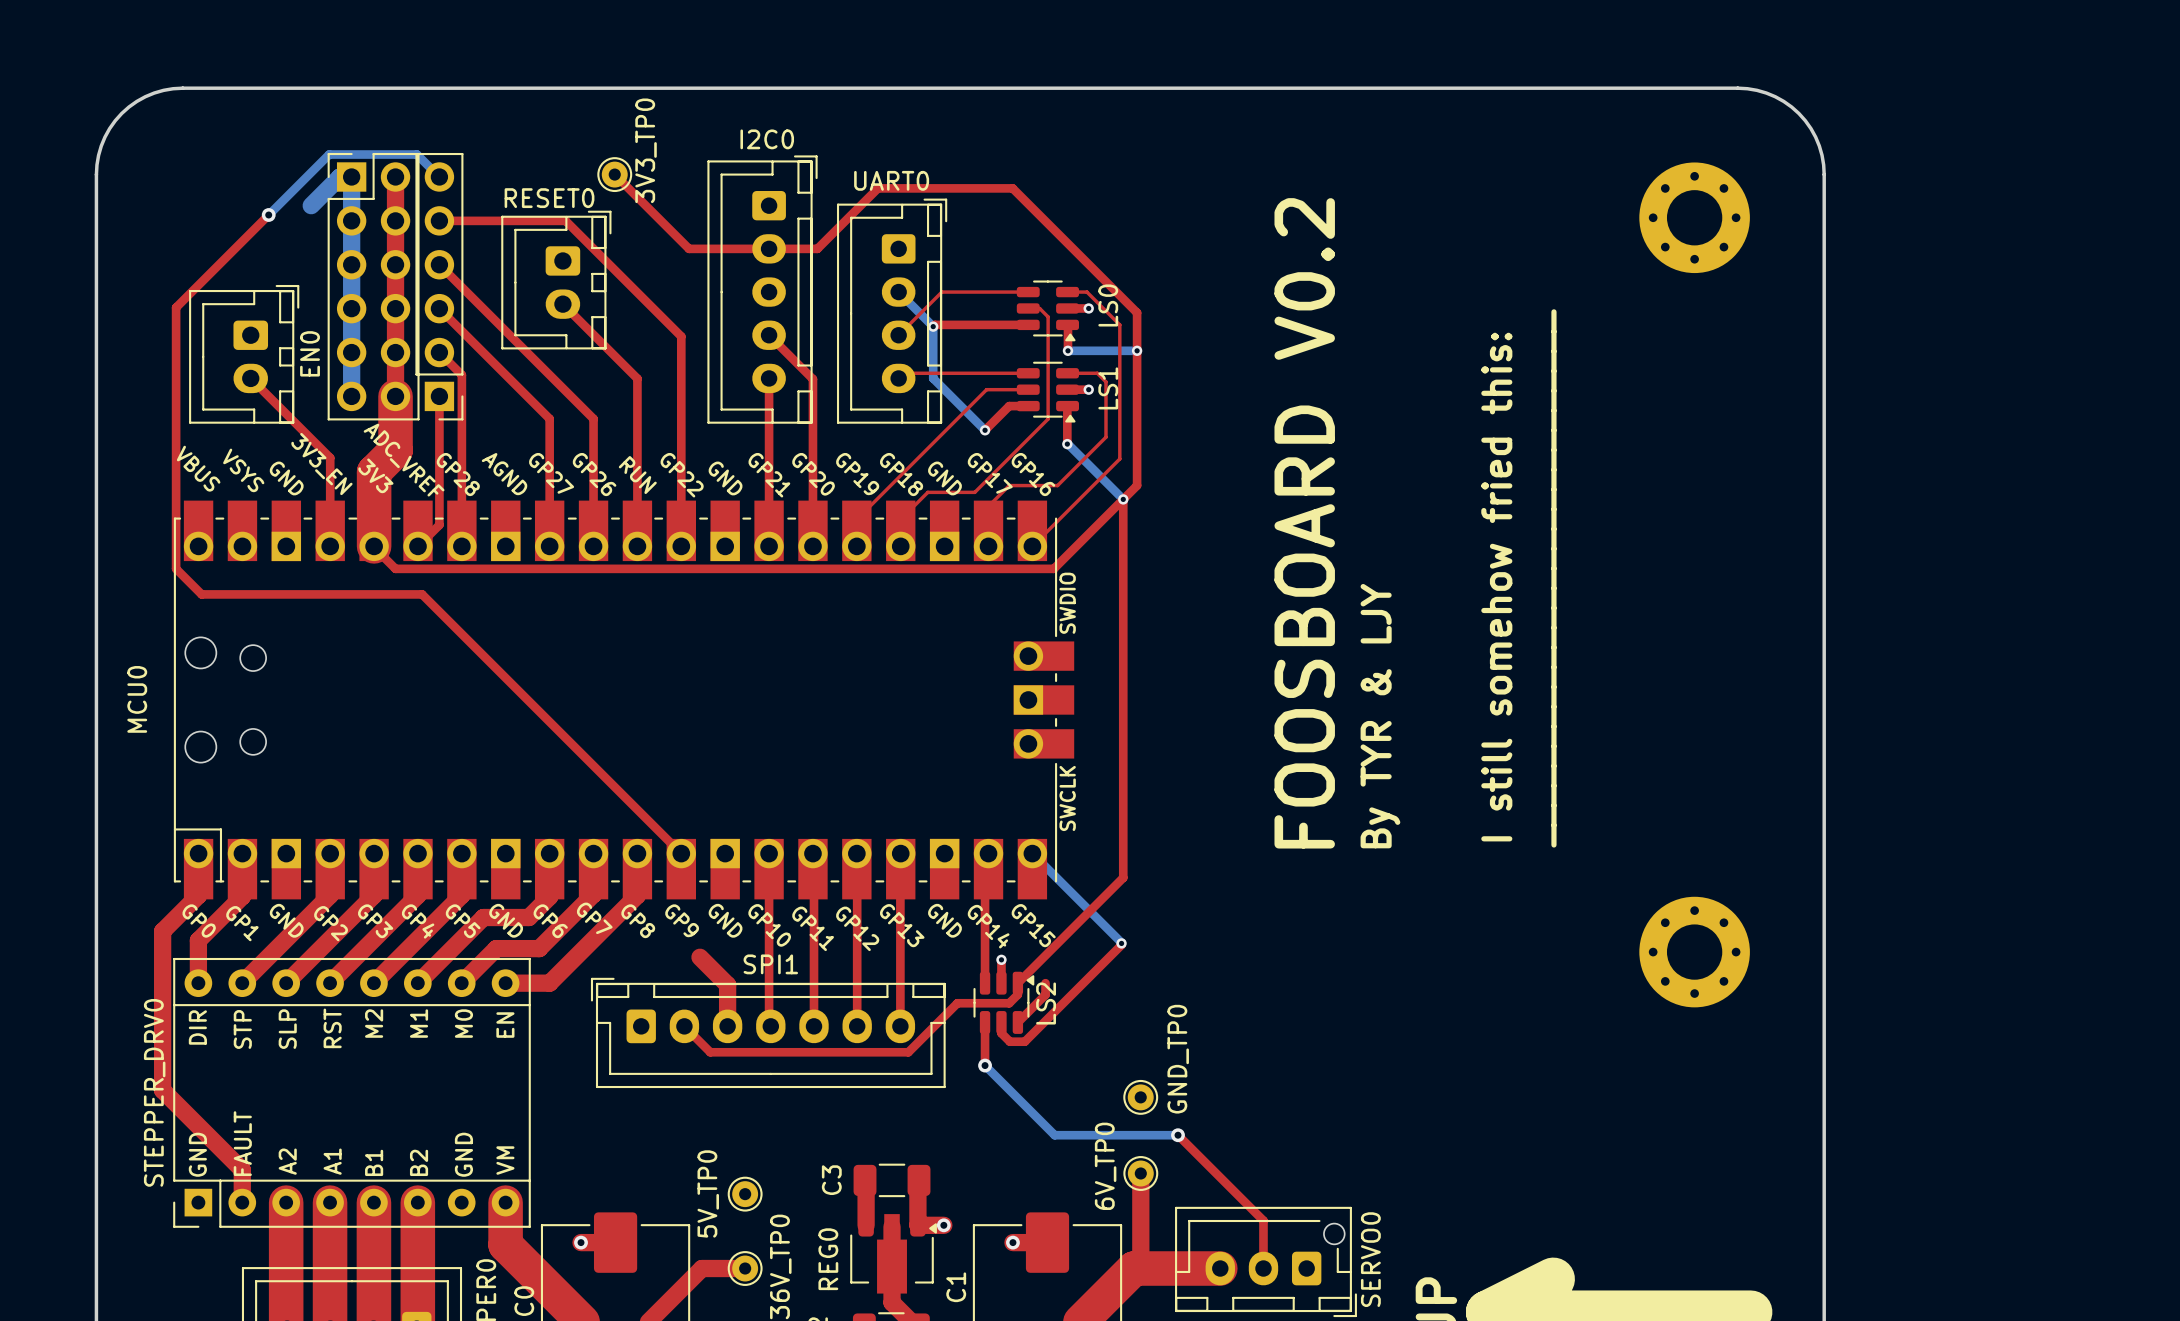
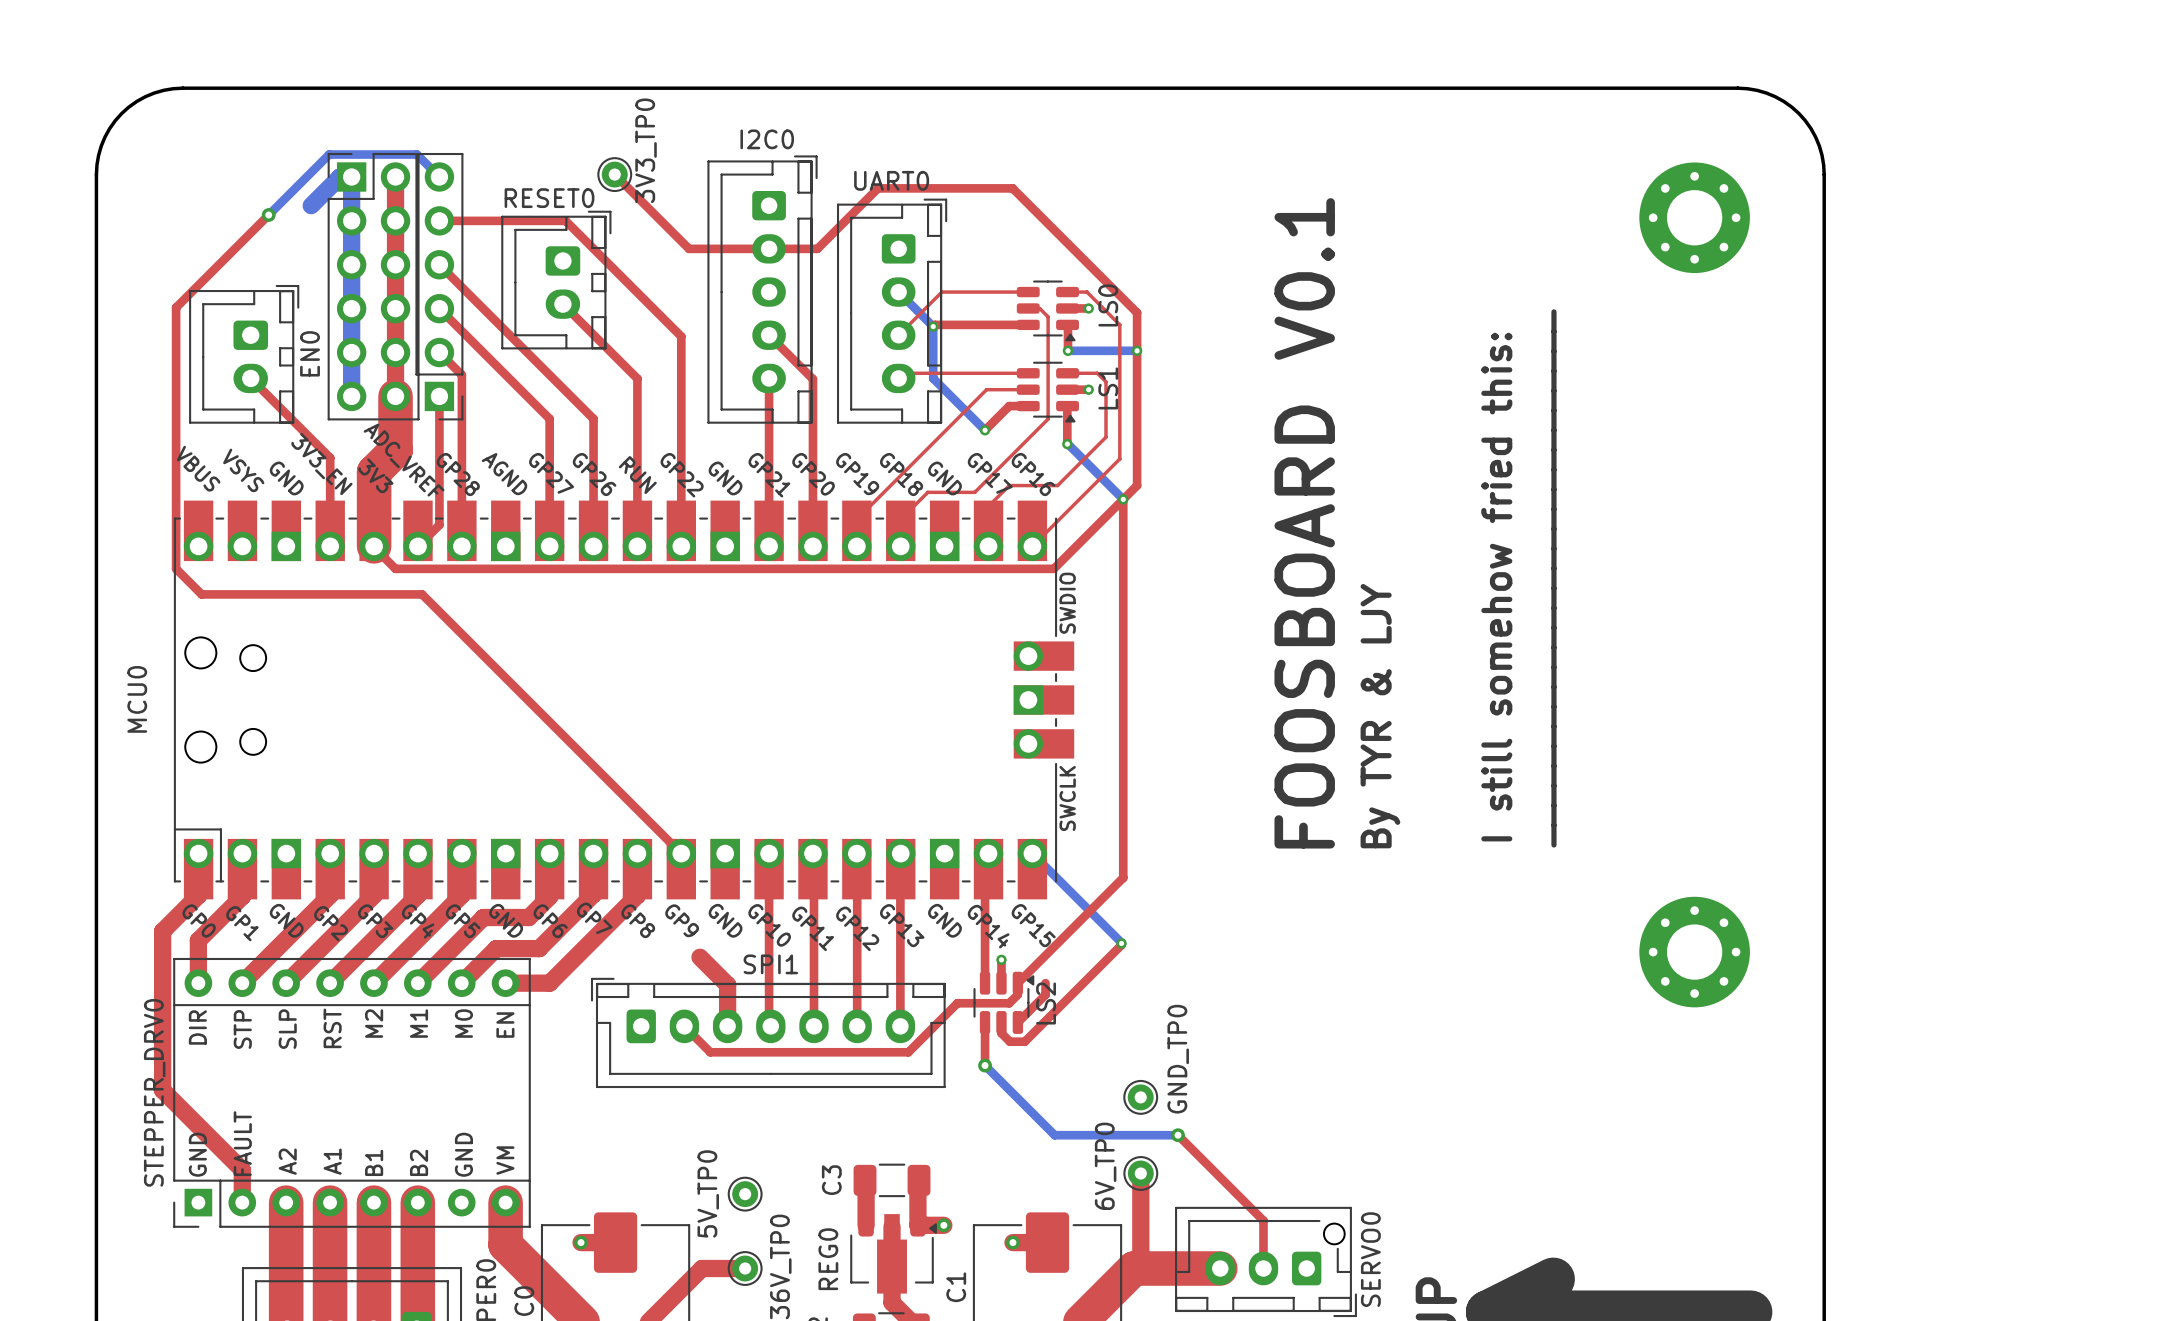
text: FOOSBOARD V0.2 (1304, 523) -> FOOSBOARD V0.1 (1304, 523)

